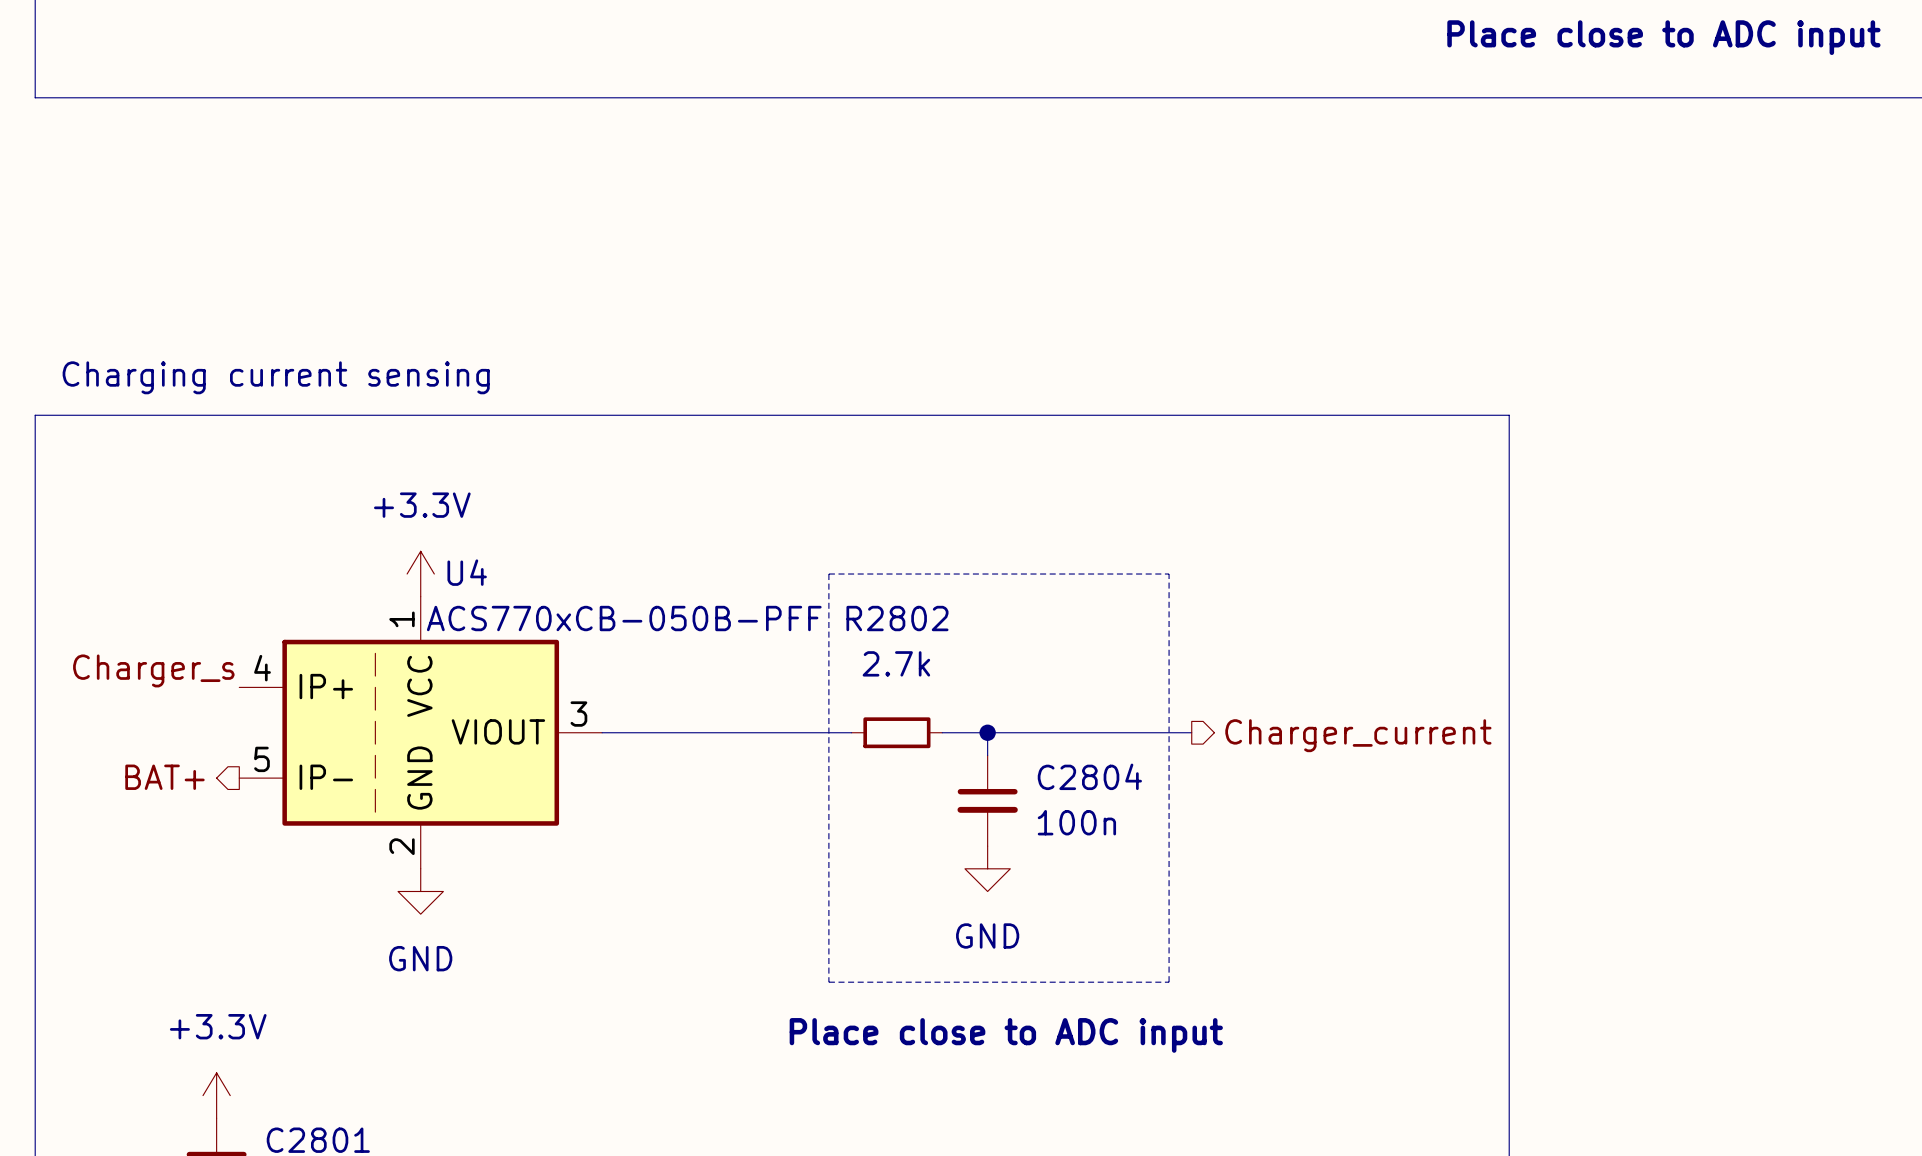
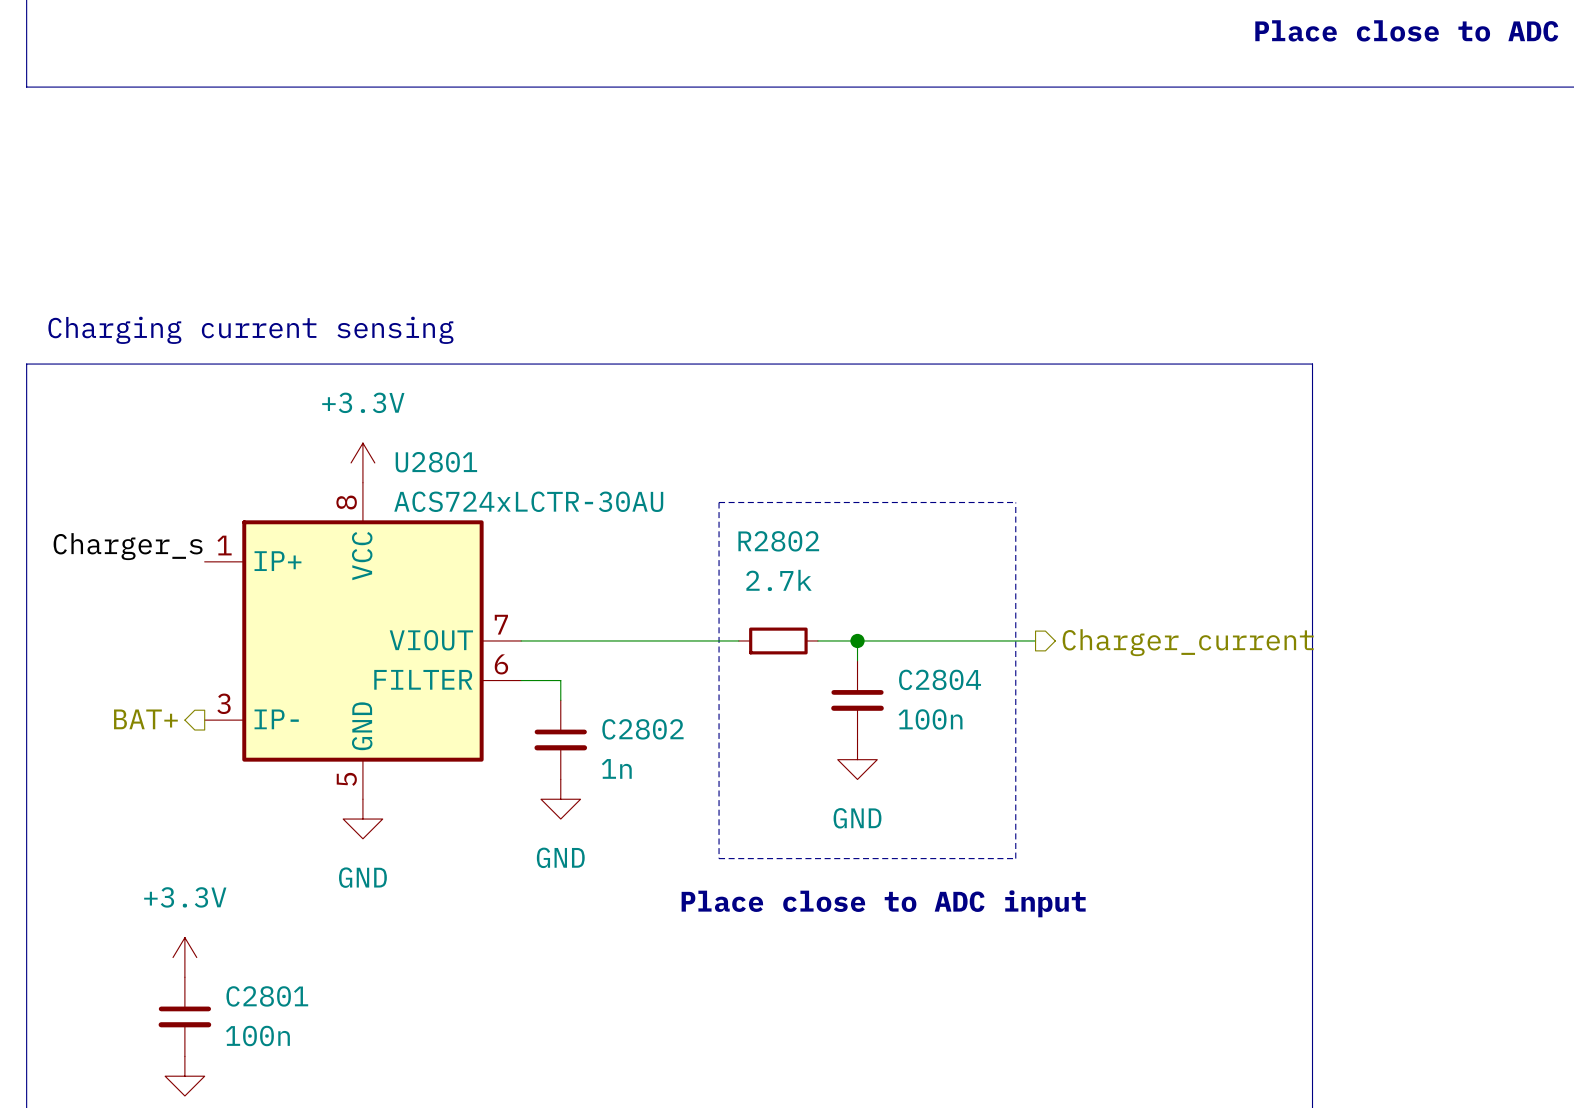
power symbol position: +3.3V (420, 574) -> +3.3V (362, 462)
label position: Charger_s (153, 670) -> Charger_s (128, 546)
U4: ACS770xCB-050B-PFF (420, 732) -> none
U2801: none -> ACS724xLCTR-30AU (362, 640)
hierarchical label position: BAT+ (164, 777) -> BAT+ (145, 719)
wire: none -> (521, 680) (560, 680) (560, 700)
C2802: none -> 1n (560, 739)
power symbol position: GND (420, 891) -> GND (362, 819)
power symbol: none -> GND (560, 799)

